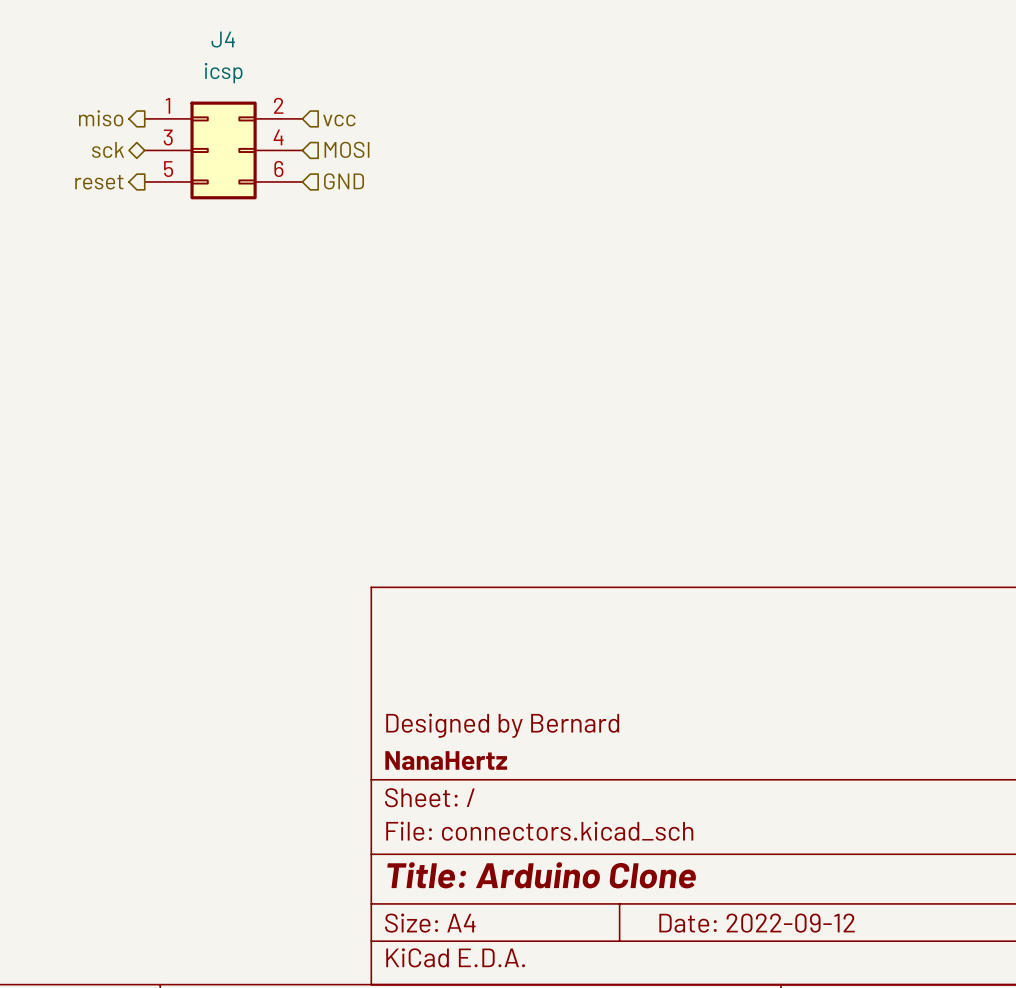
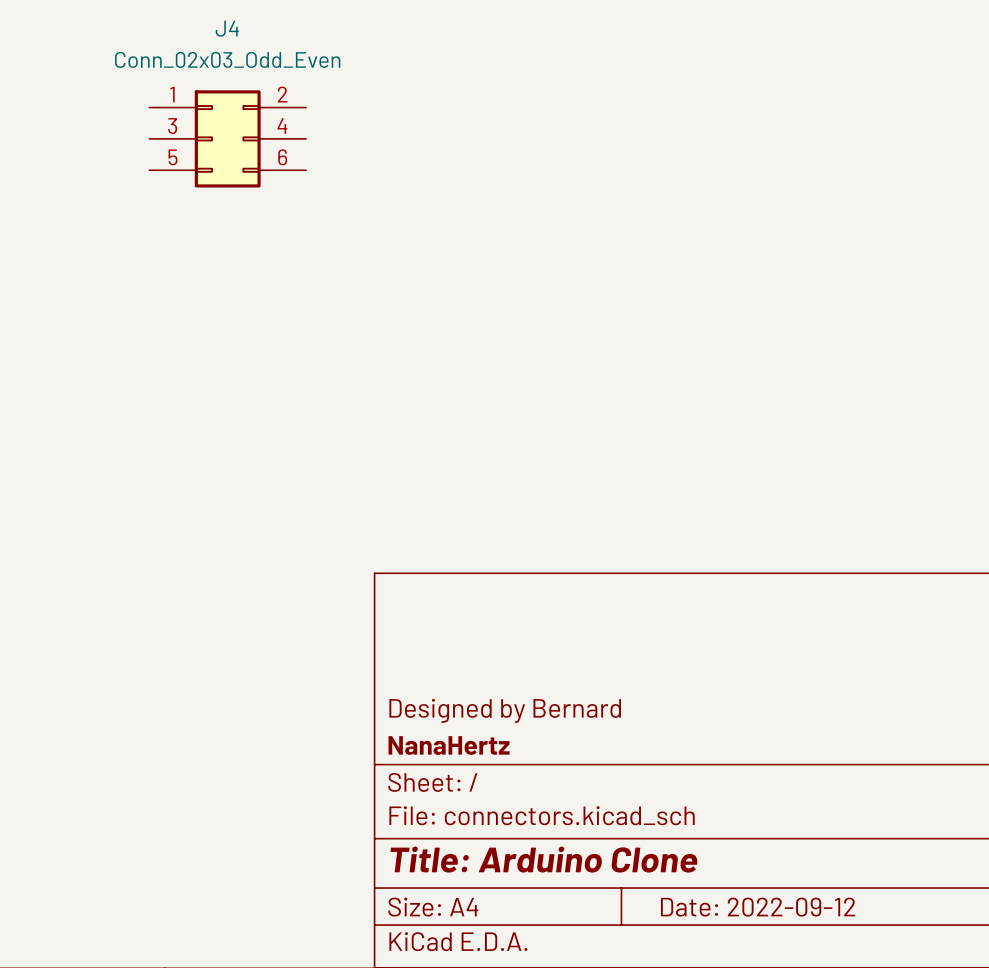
J4 value: icsp (223, 73) -> Conn_02x03_Odd_Even (227, 59)
hierarchical label: miso (101, 118) -> none
hierarchical label: vcc (339, 120) -> none
hierarchical label: sck (108, 149) -> none
hierarchical label: MOSI (346, 149) -> none
hierarchical label: GND (344, 181) -> none
hierarchical label: reset (99, 182) -> none

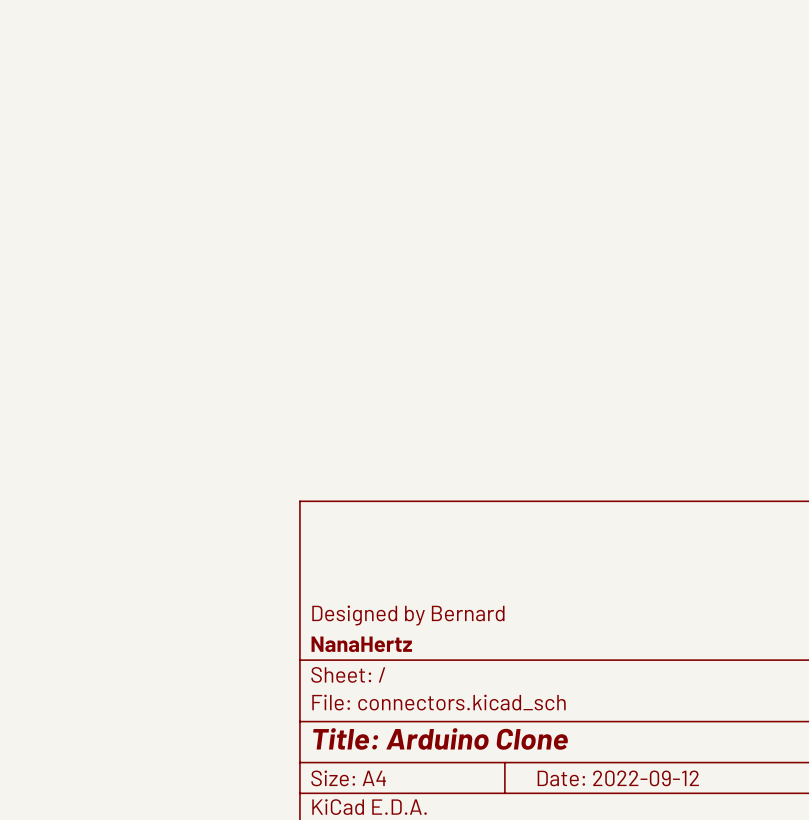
J4: Conn_02x03_Odd_Even (227, 138) -> none

